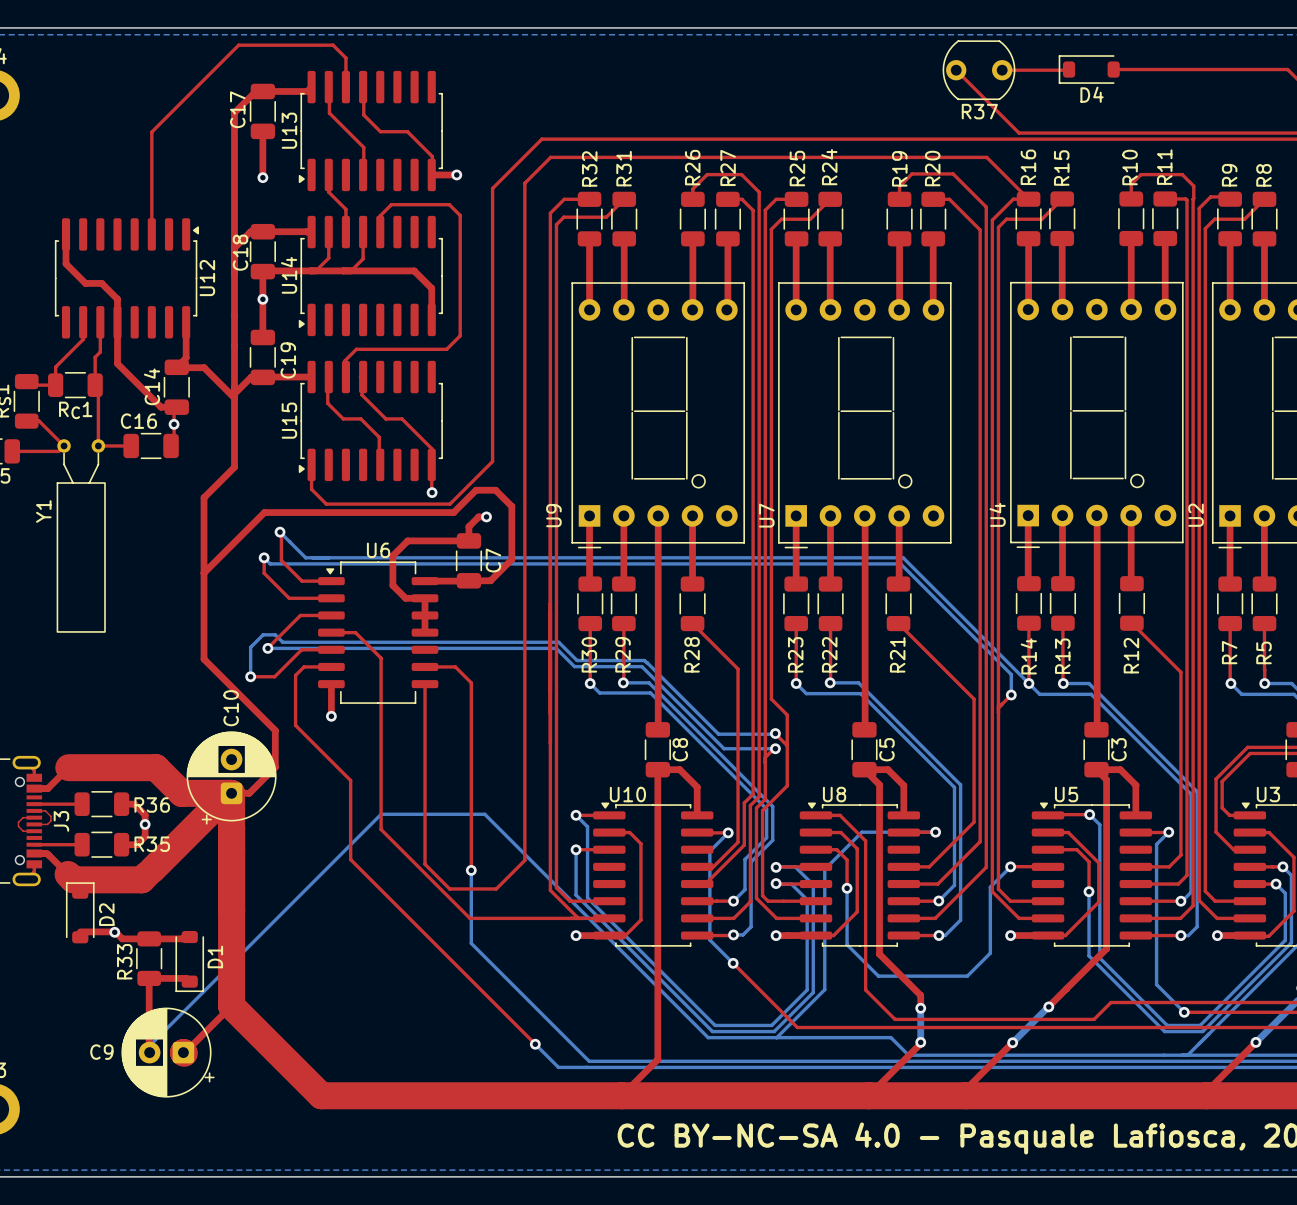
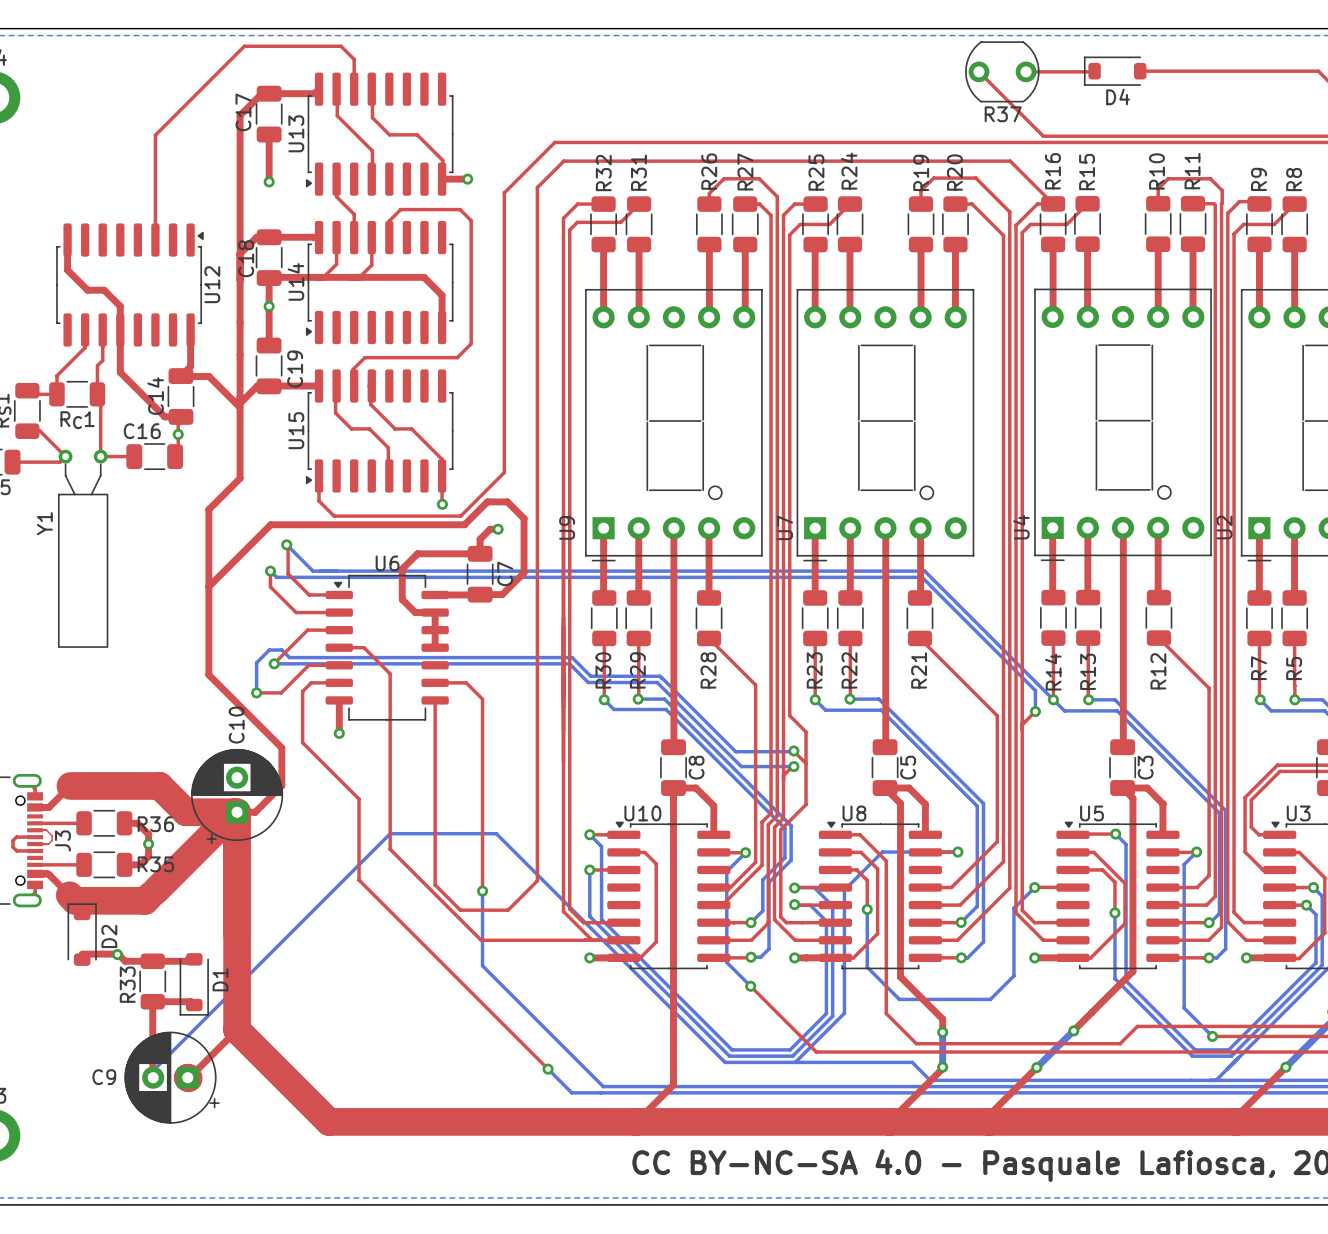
top track: (23, 817) (18, 822) (18, 826) (23, 831) -> none
top track: none -> (29, 837) (16, 837) (13, 840) (13, 847) (16, 850) (29, 850)

